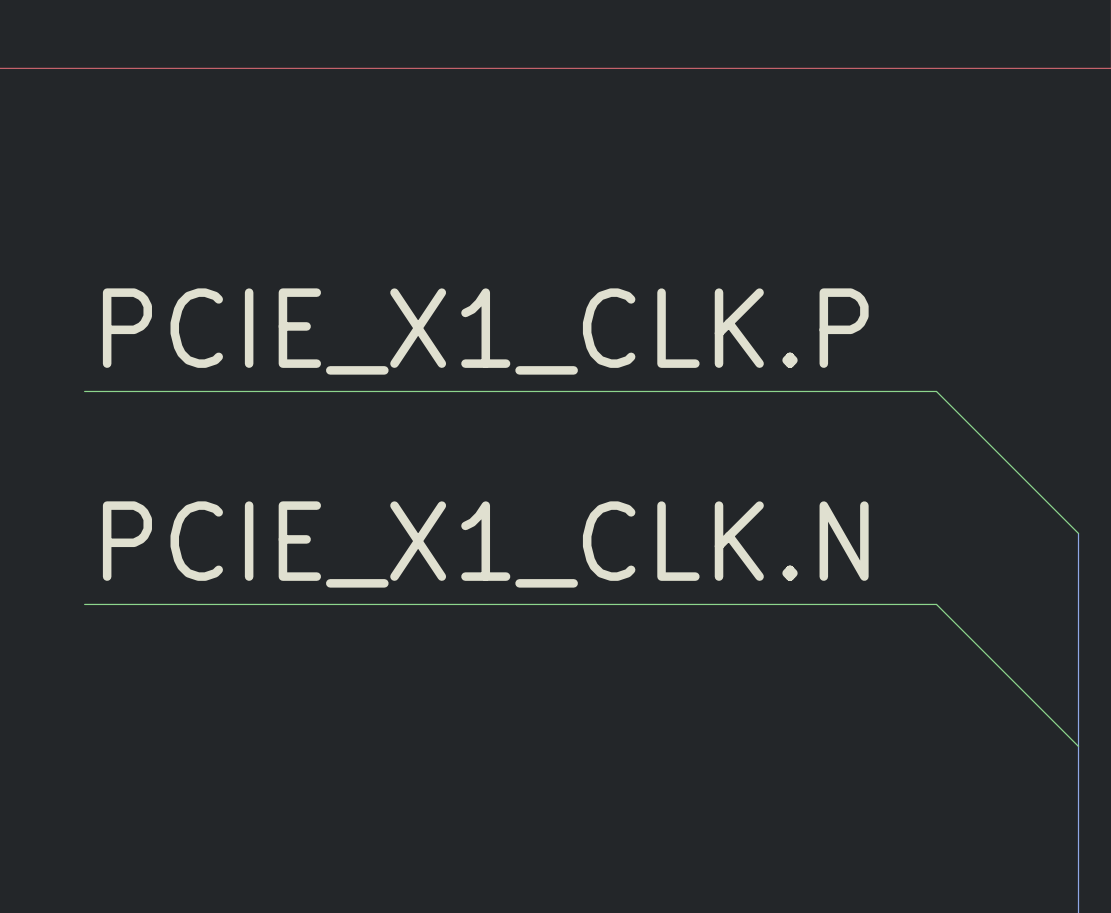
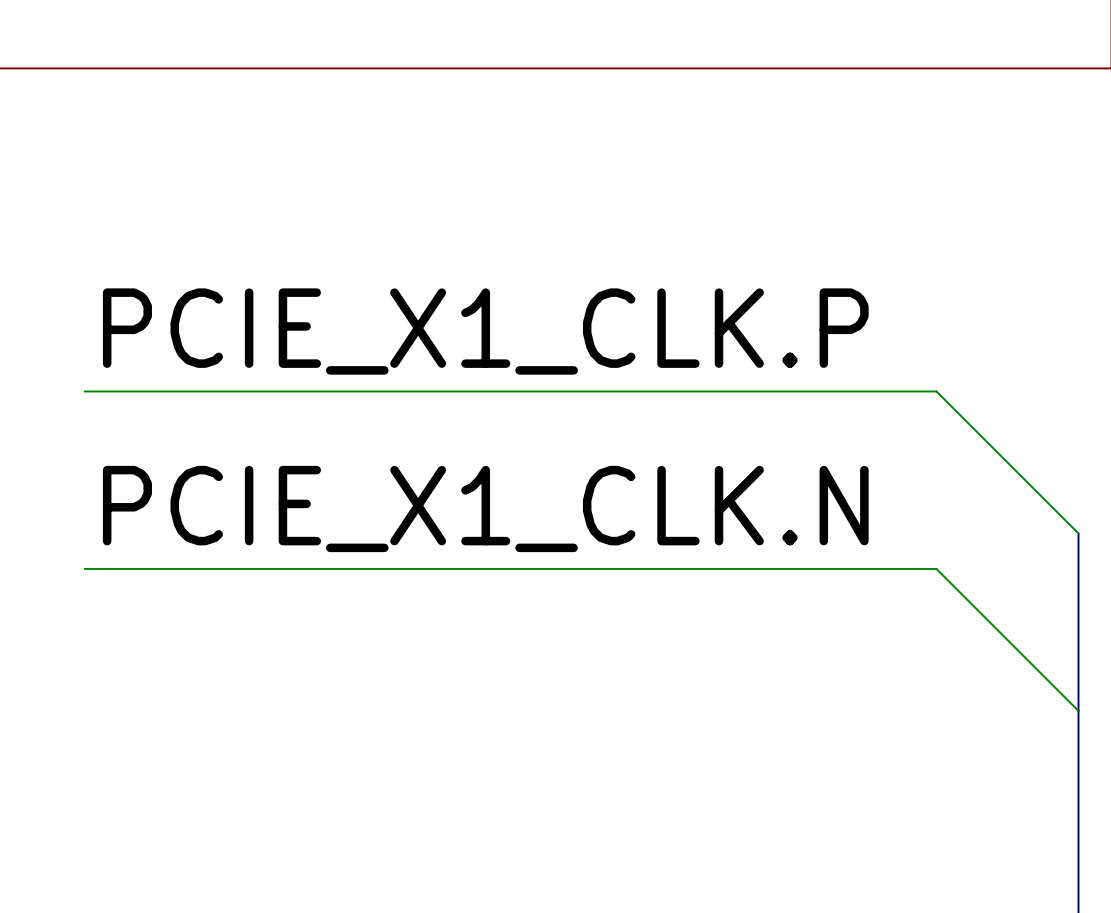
label position: PCIE_X1_CLK.N (485, 544) -> PCIE_X1_CLK.N (485, 508)
wire: none -> (84, 568) (936, 568)
wire: none -> (936, 568) (1078, 710)
wire: (84, 604) (936, 604) (1078, 746) -> none

